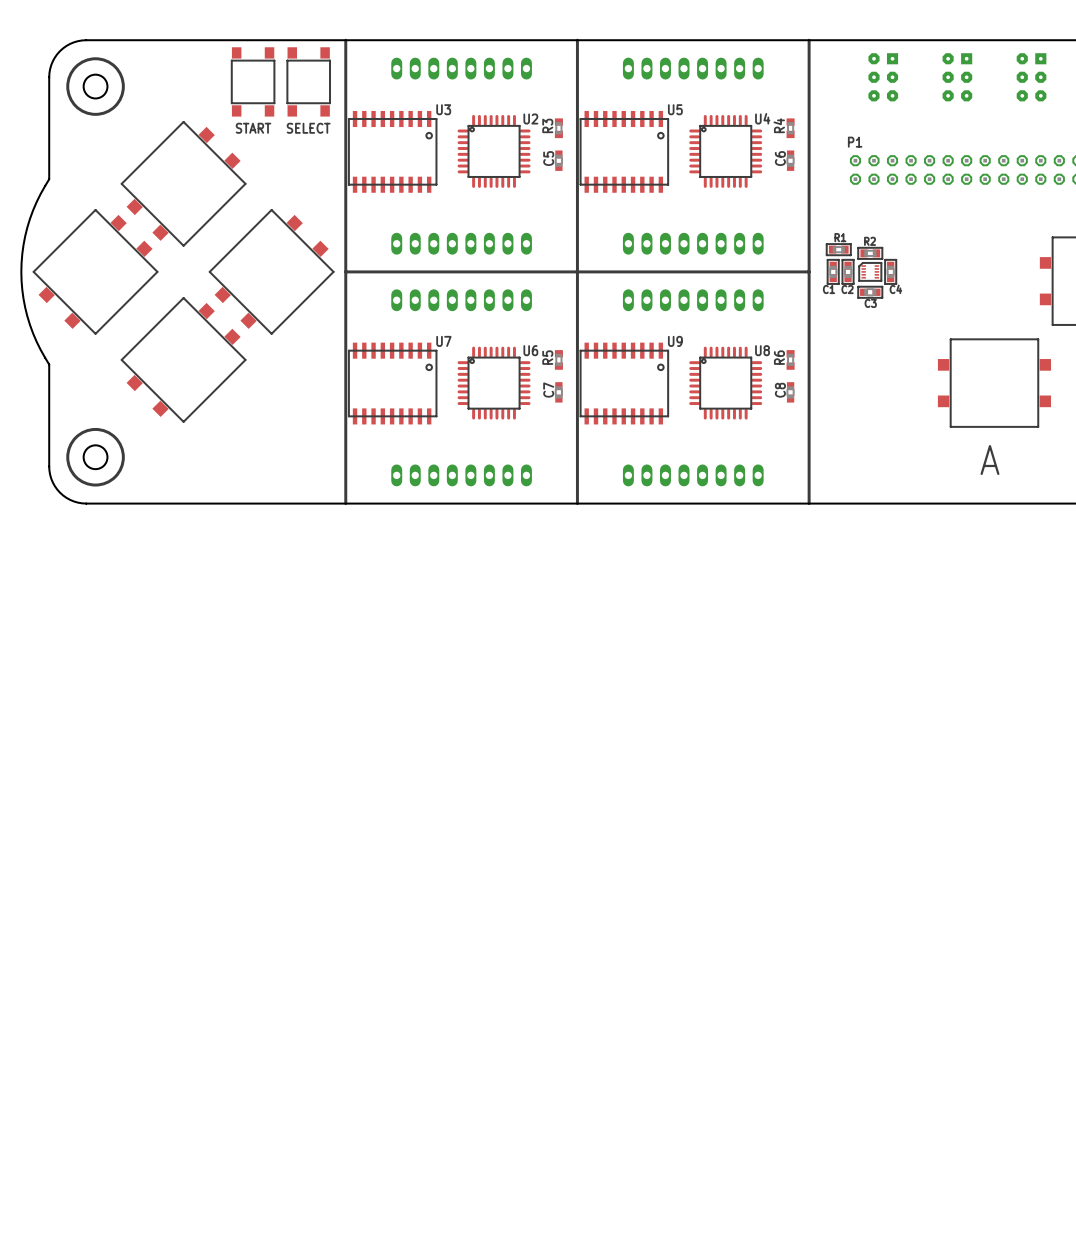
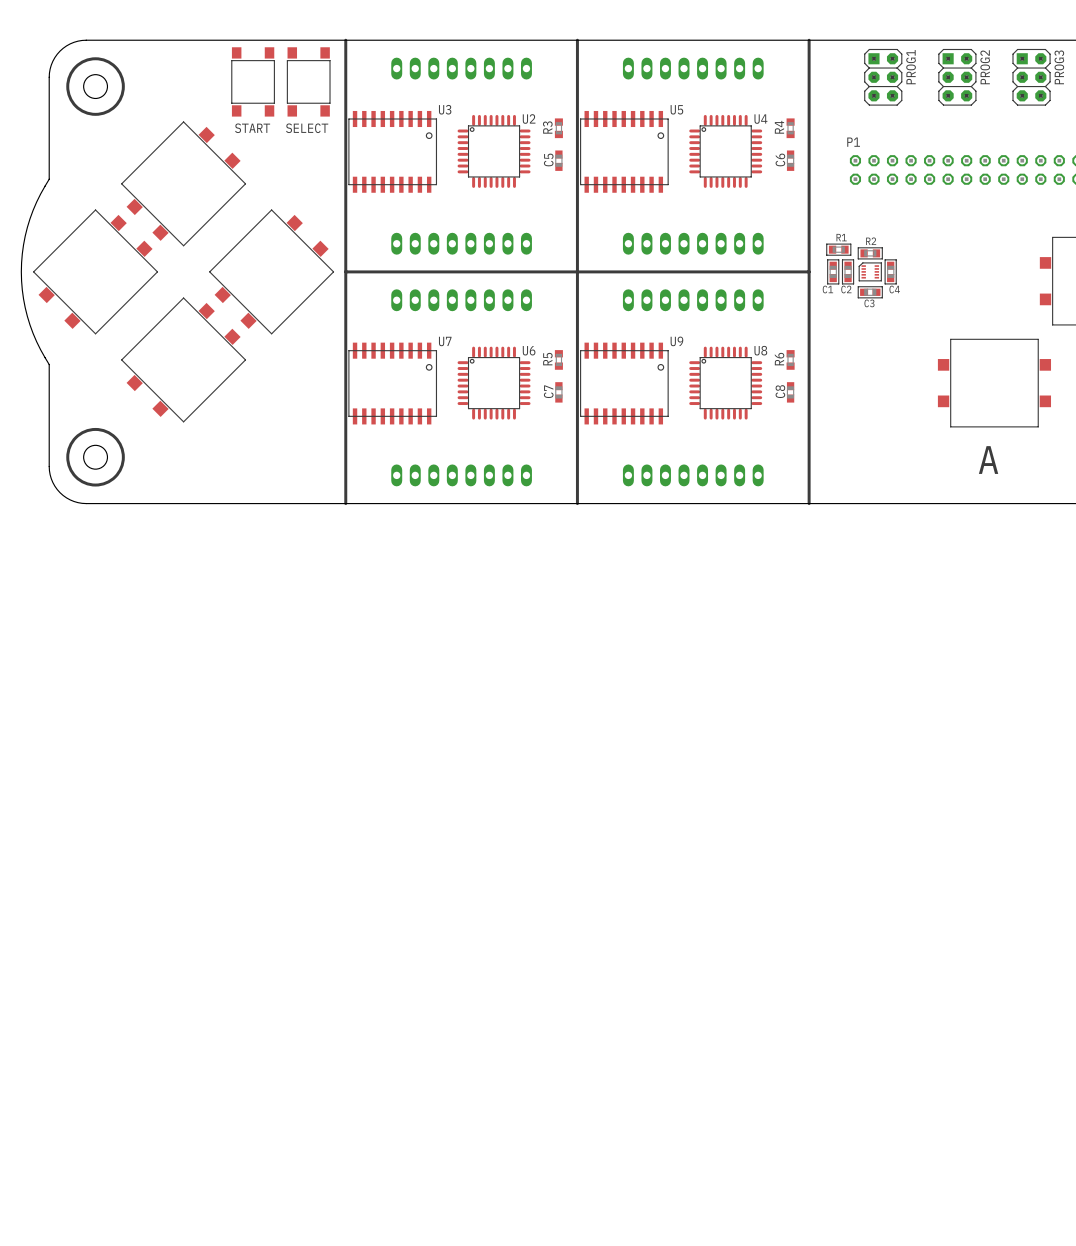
part: (883, 77) -> none
PROG1: none -> (883, 77)
part: (957, 77) -> none
PROG2: none -> (957, 77)
part: (1031, 77) -> none
PROG3: none -> (1031, 77)

